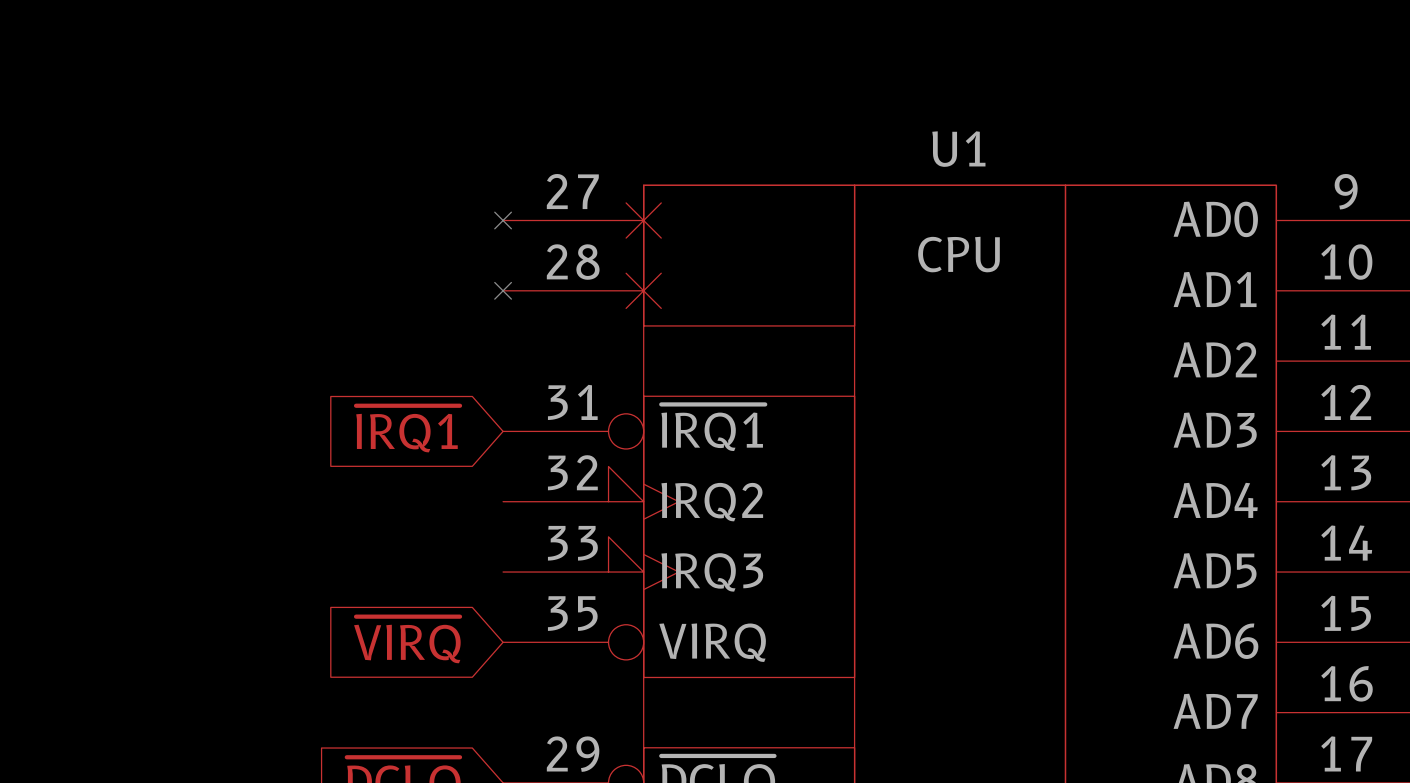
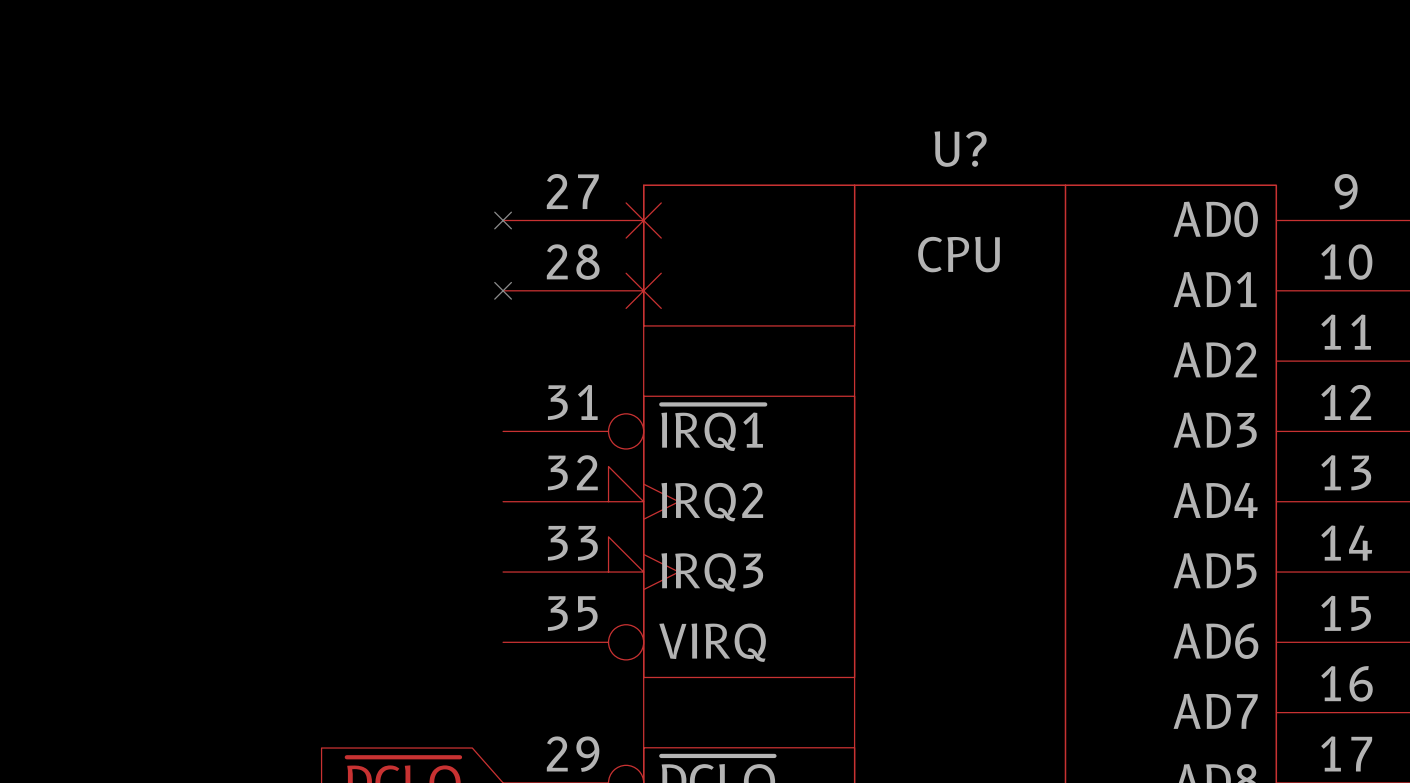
U1 name: U1 (958, 149) -> U? (960, 149)
global label: ~{IRQ1} (408, 429) -> none
global label: ~{VIRQ} (407, 639) -> none

